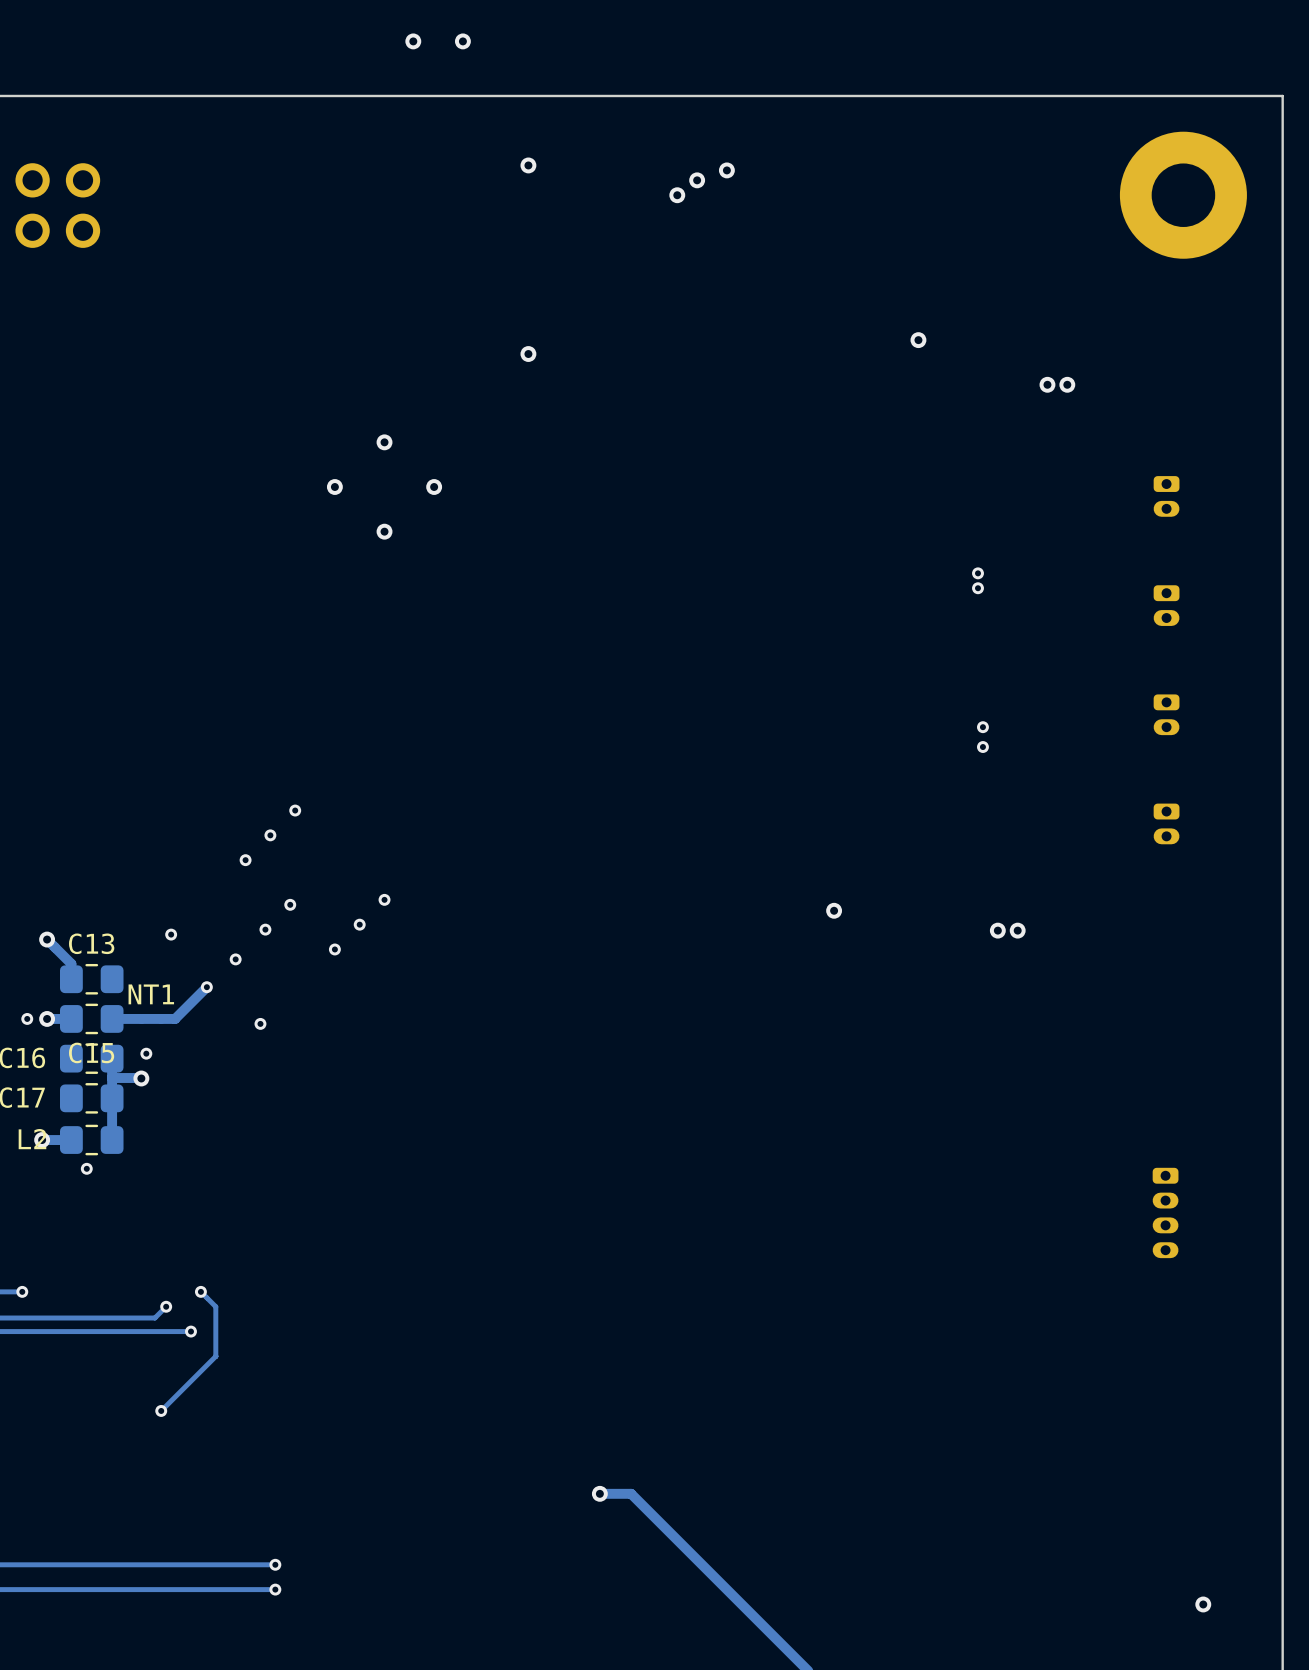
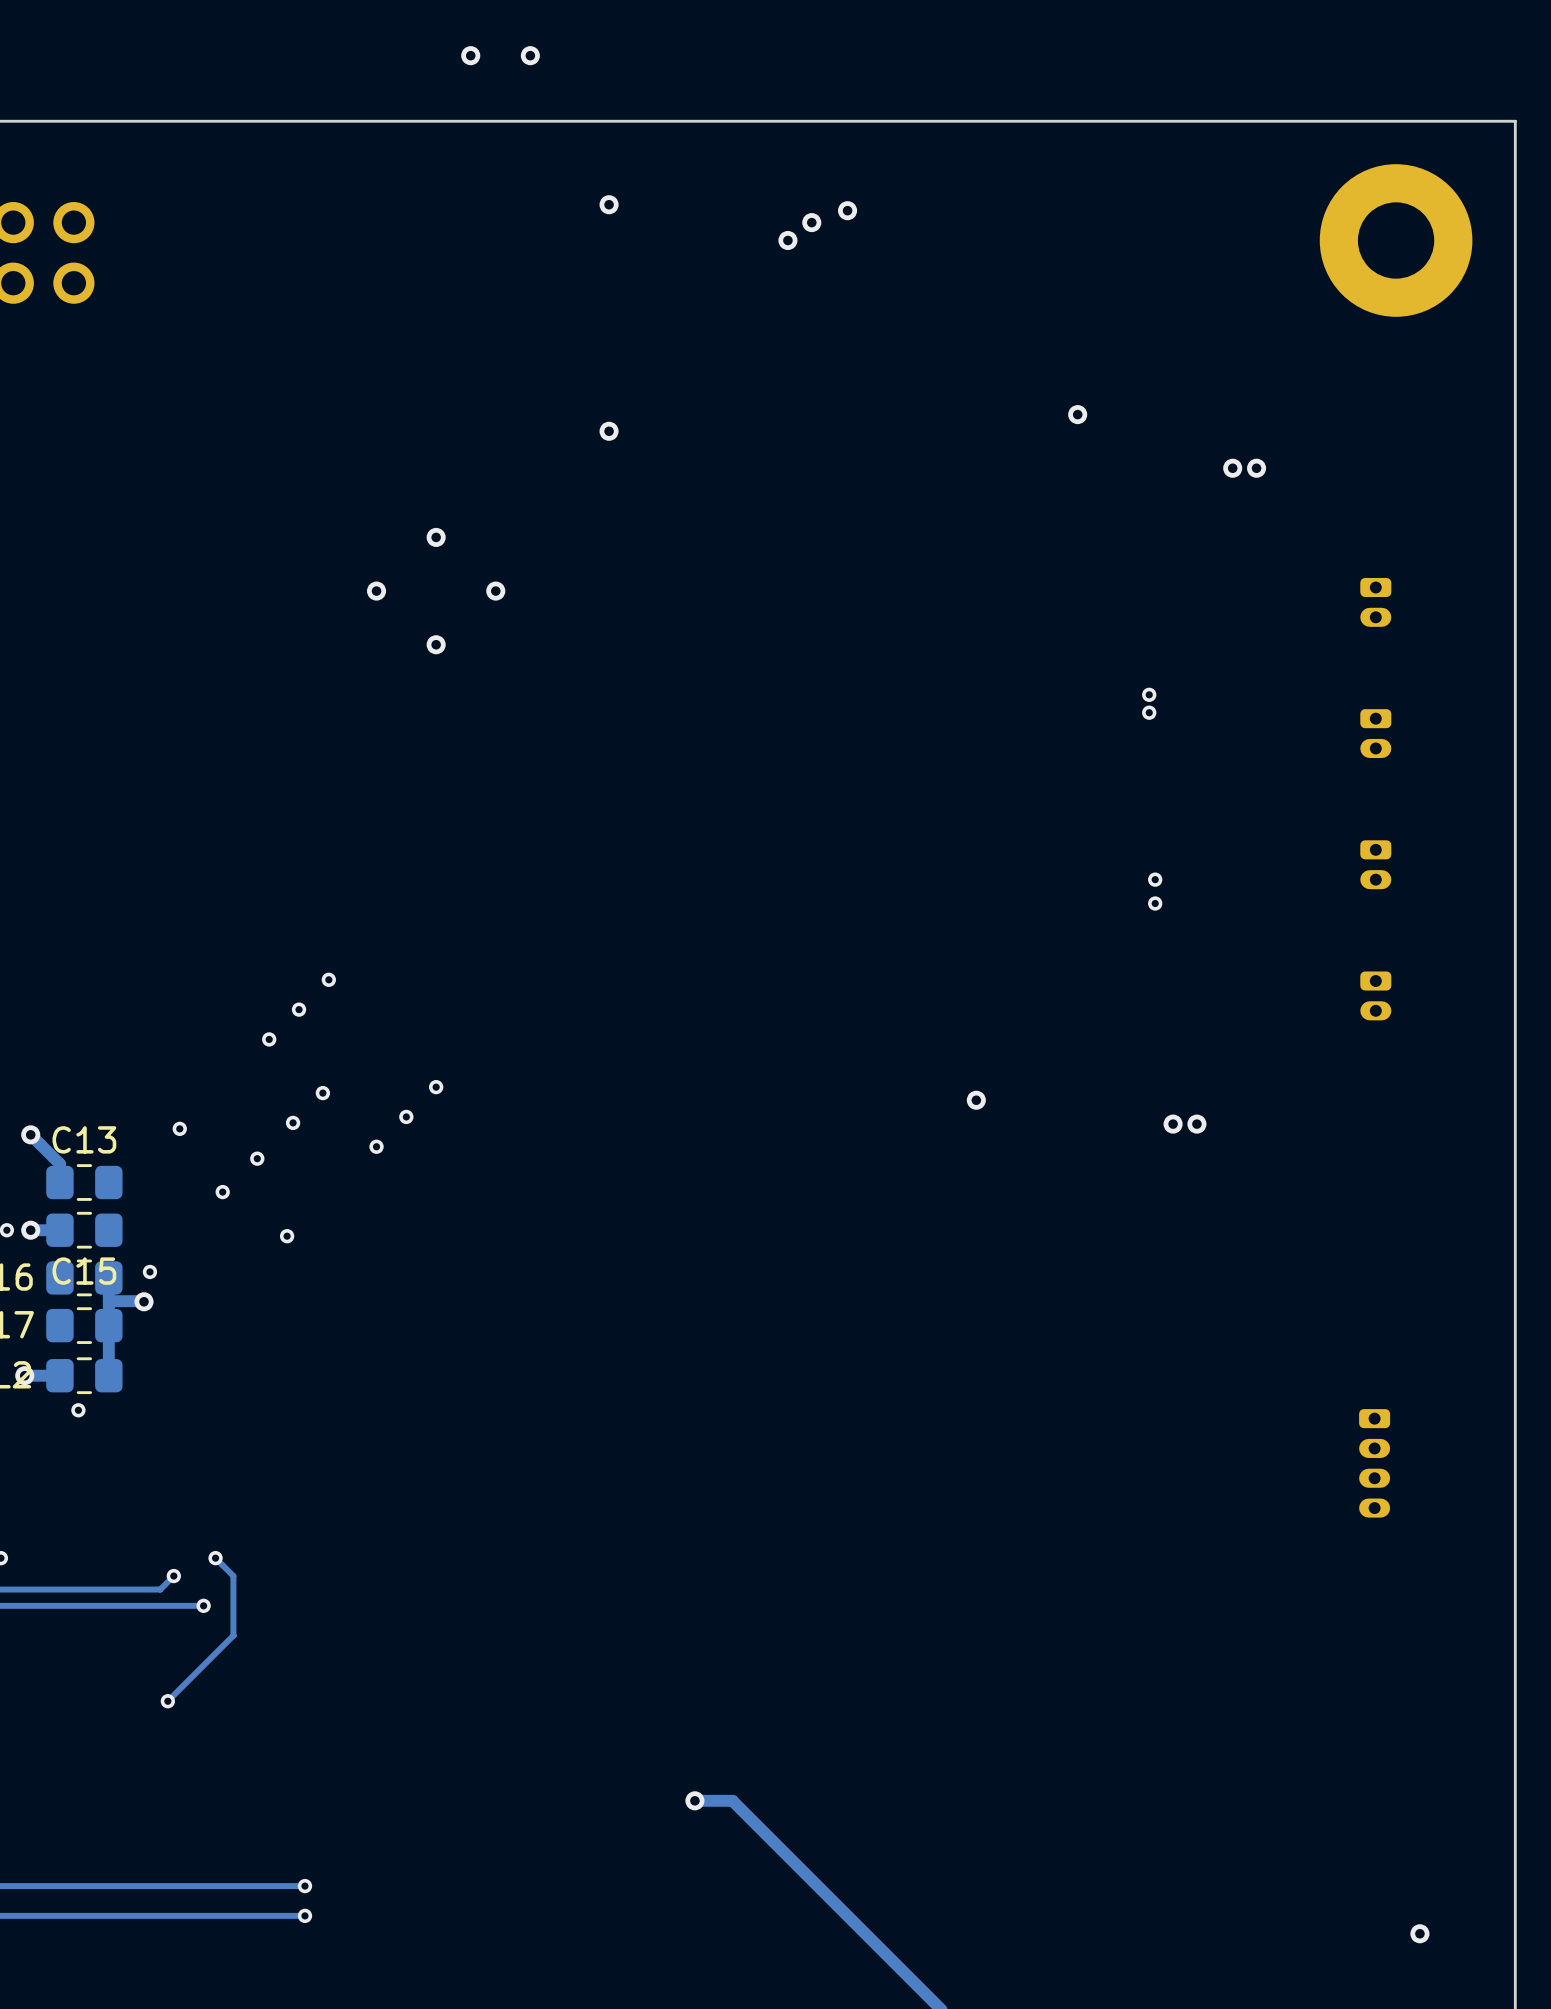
track: (206, 987) (175, 1018) (161, 1018) -> none
track: (141, 1018) (112, 1018) -> none
NT1: (151, 1018) -> none

